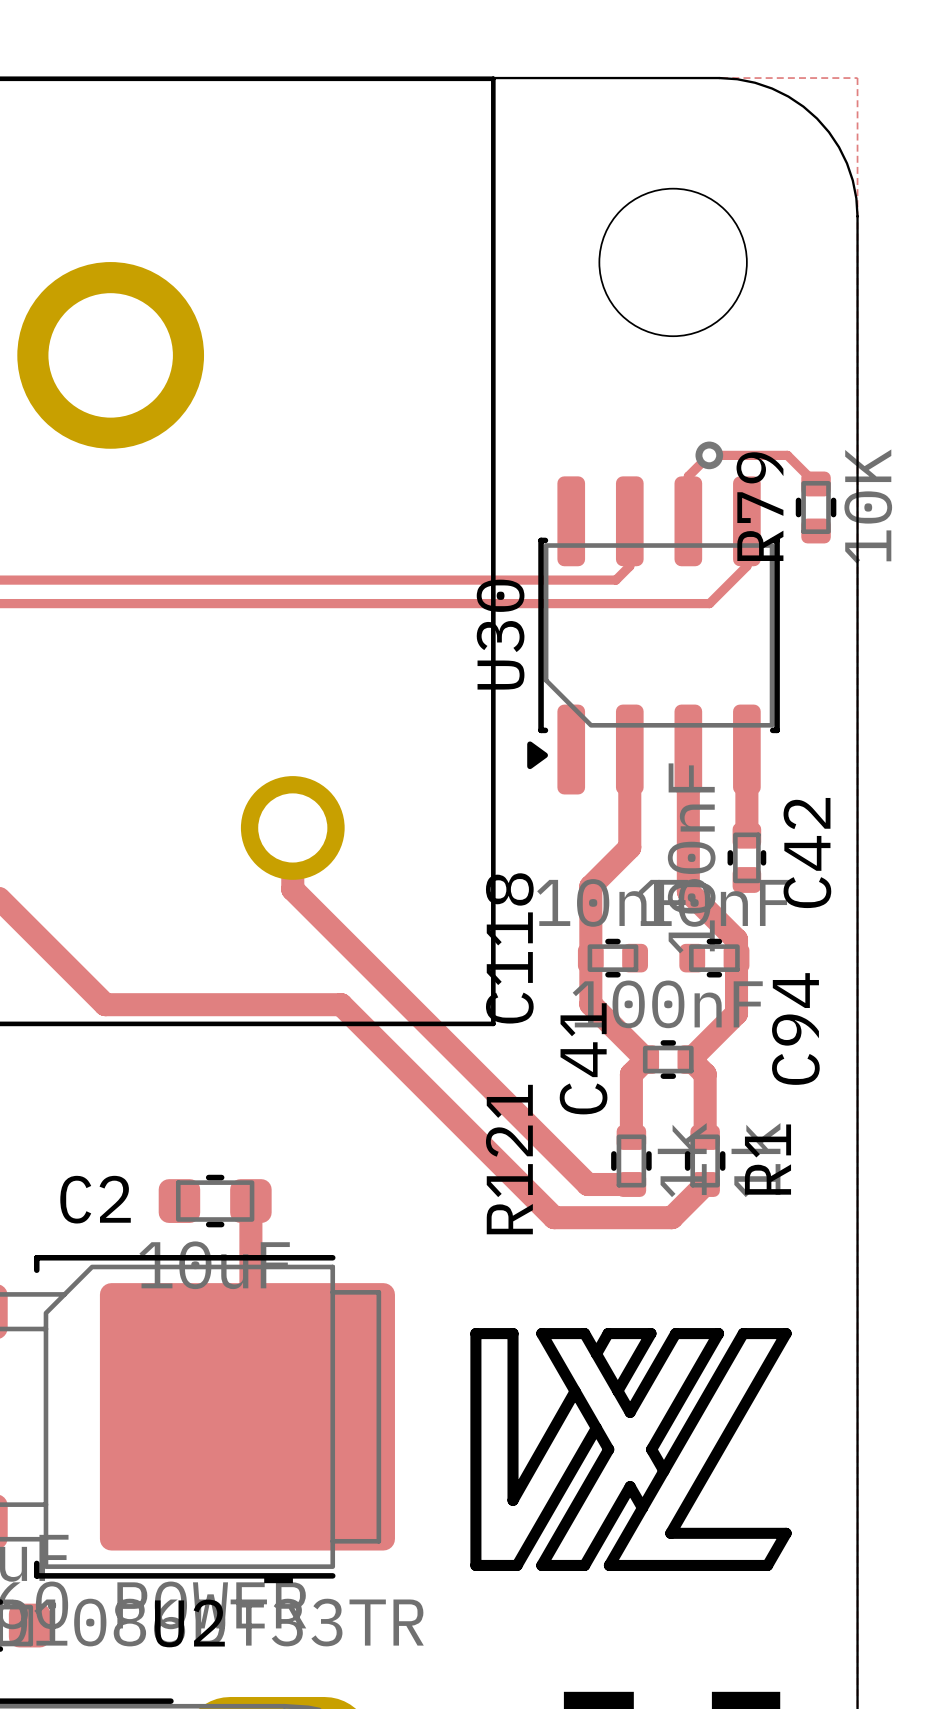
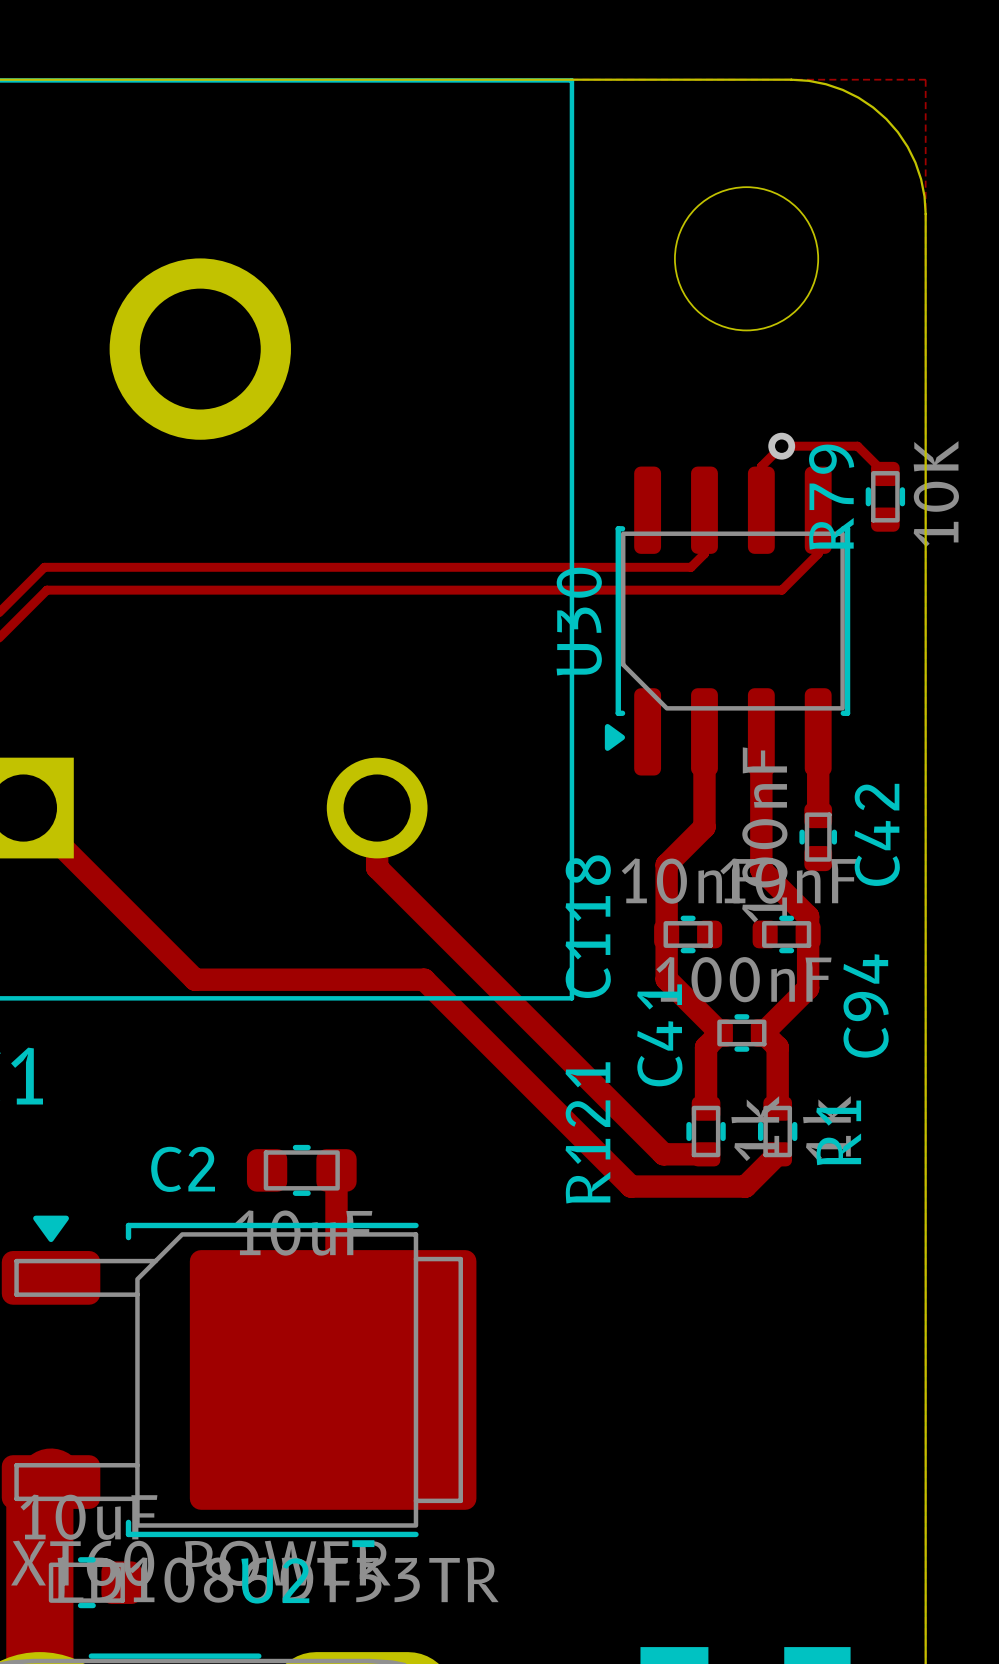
line: (743, 1333) (786, 1333) (670, 1533) (786, 1533) (767, 1565) (609, 1565) (743, 1333) -> none
line: (596, 1354) (608, 1333) (650, 1333) (617, 1390) -> none
line: (575, 1391) (513, 1500) (513, 1333) (475, 1333) (475, 1565) (517, 1565) (596, 1428) -> none
line: (663, 1470) (651, 1449) (718, 1333) (675, 1333) (630, 1412) (584, 1333) (541, 1333) (608, 1449) (541, 1565) (584, 1565) (630, 1486) (642, 1508) -> none

